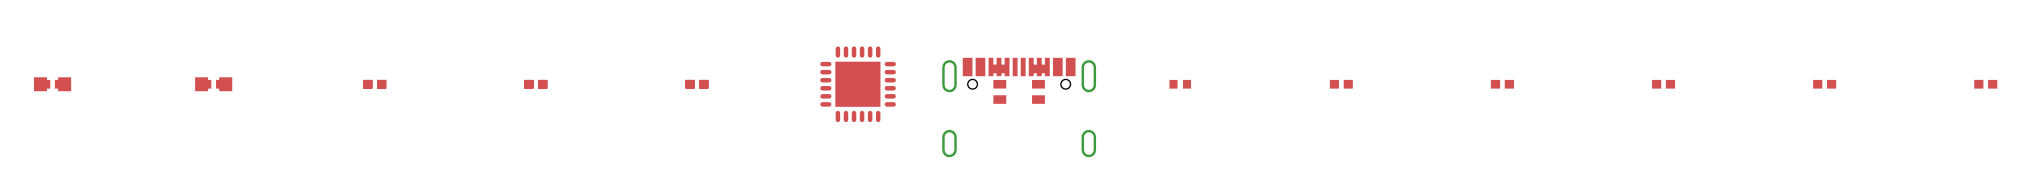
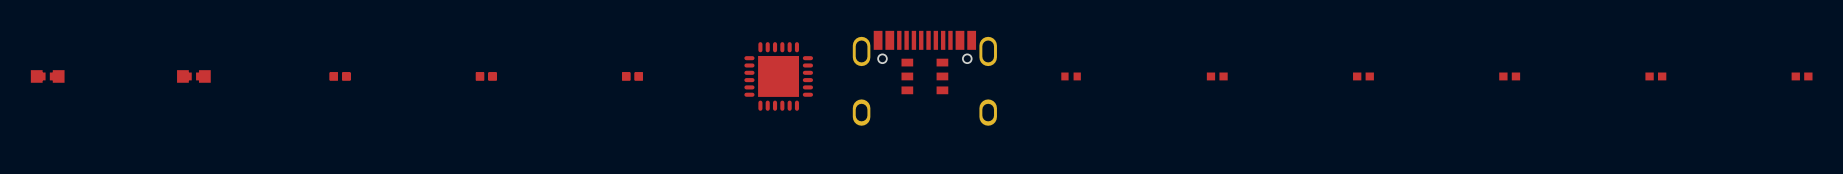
part: none -> (924, 78)
part: (1019, 107) -> none

